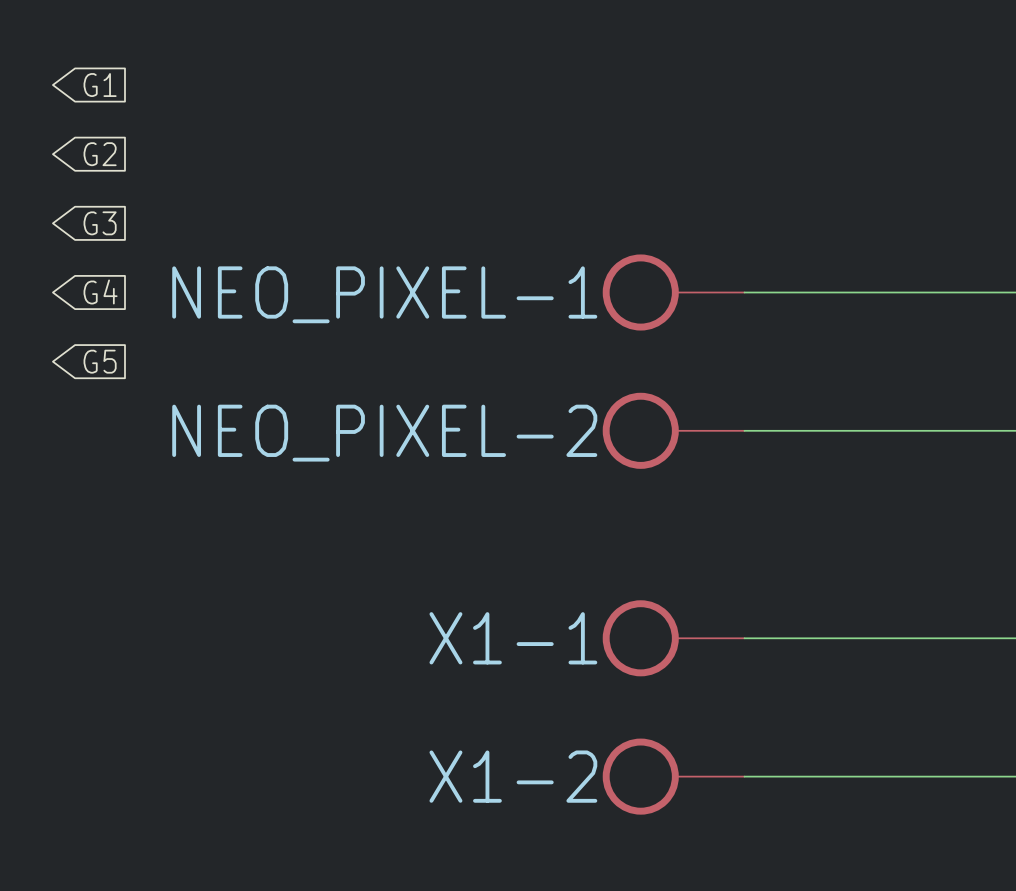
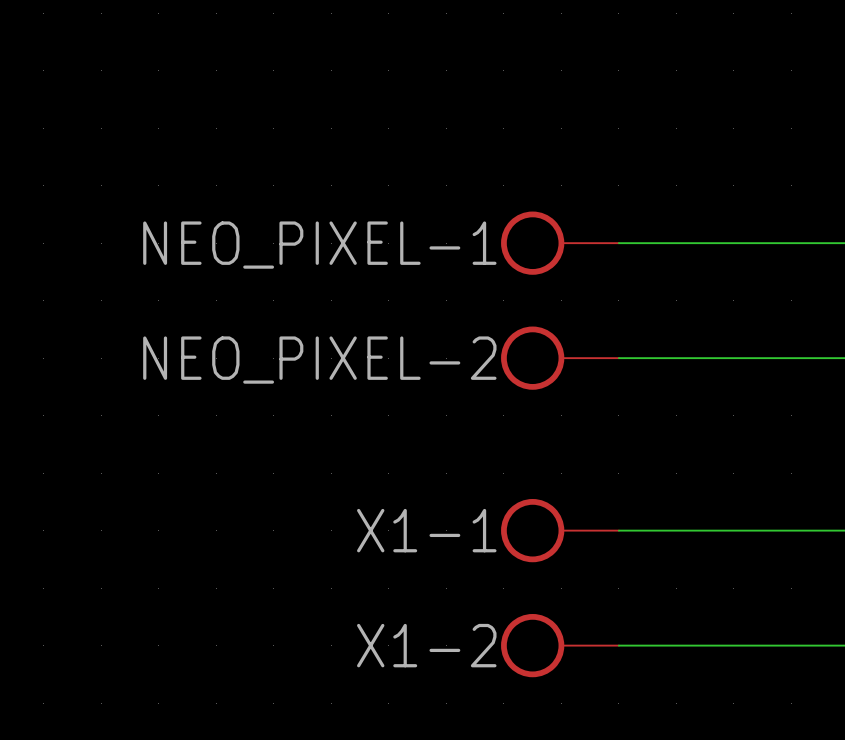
global label: G1 (100, 85) -> none
global label: G2 (100, 154) -> none
global label: G3 (100, 223) -> none
global label: G4 (100, 291) -> none
global label: G5 (100, 361) -> none

